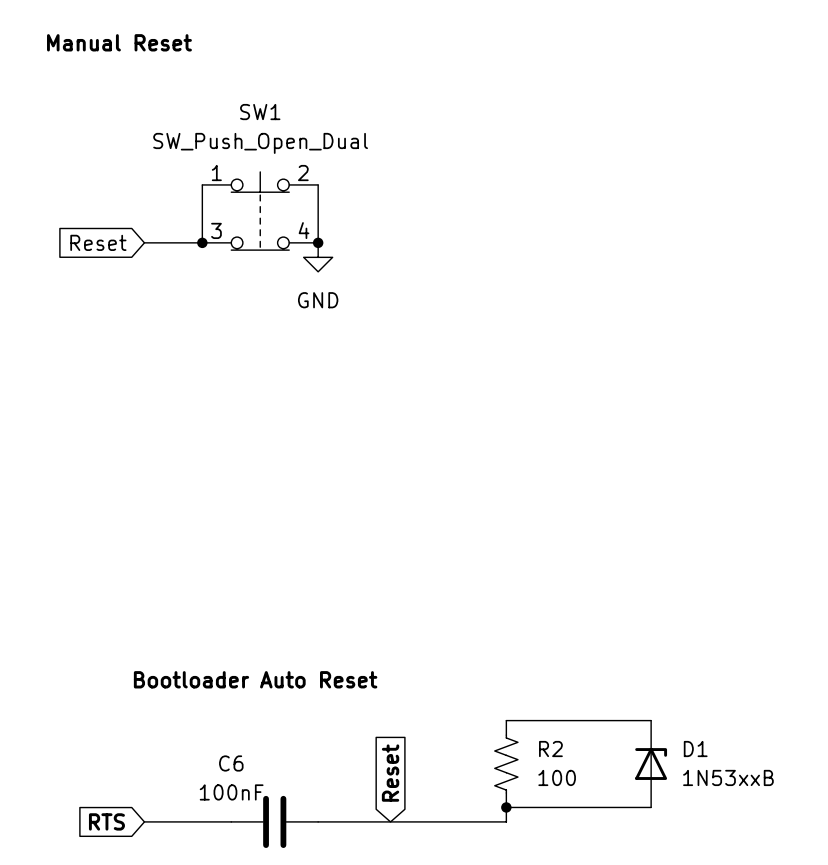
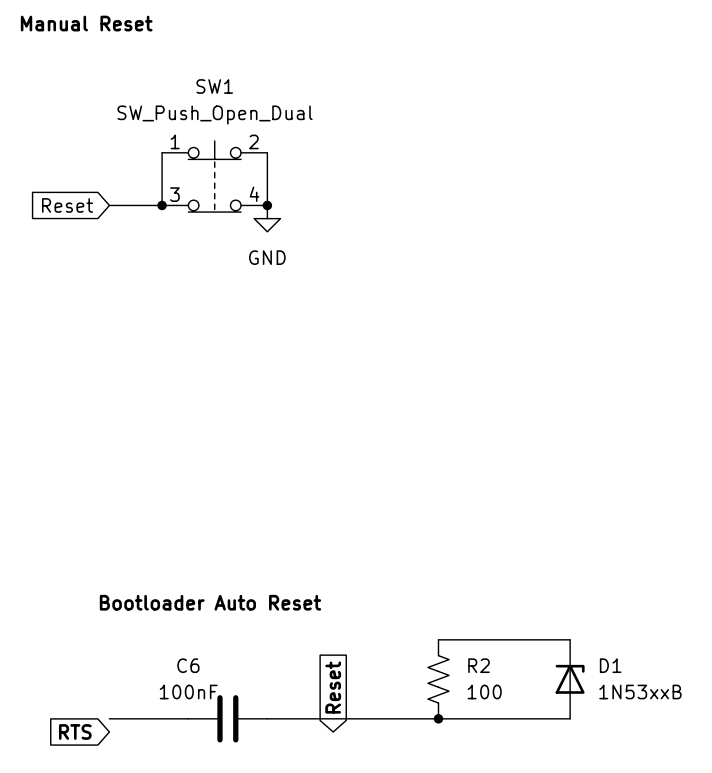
wire: (506, 807) (506, 821) (318, 821) -> (438, 718) (267, 718)
wire: (144, 821) (231, 821) -> (109, 718) (188, 718)
C6 position: (274, 821) -> (227, 718)

